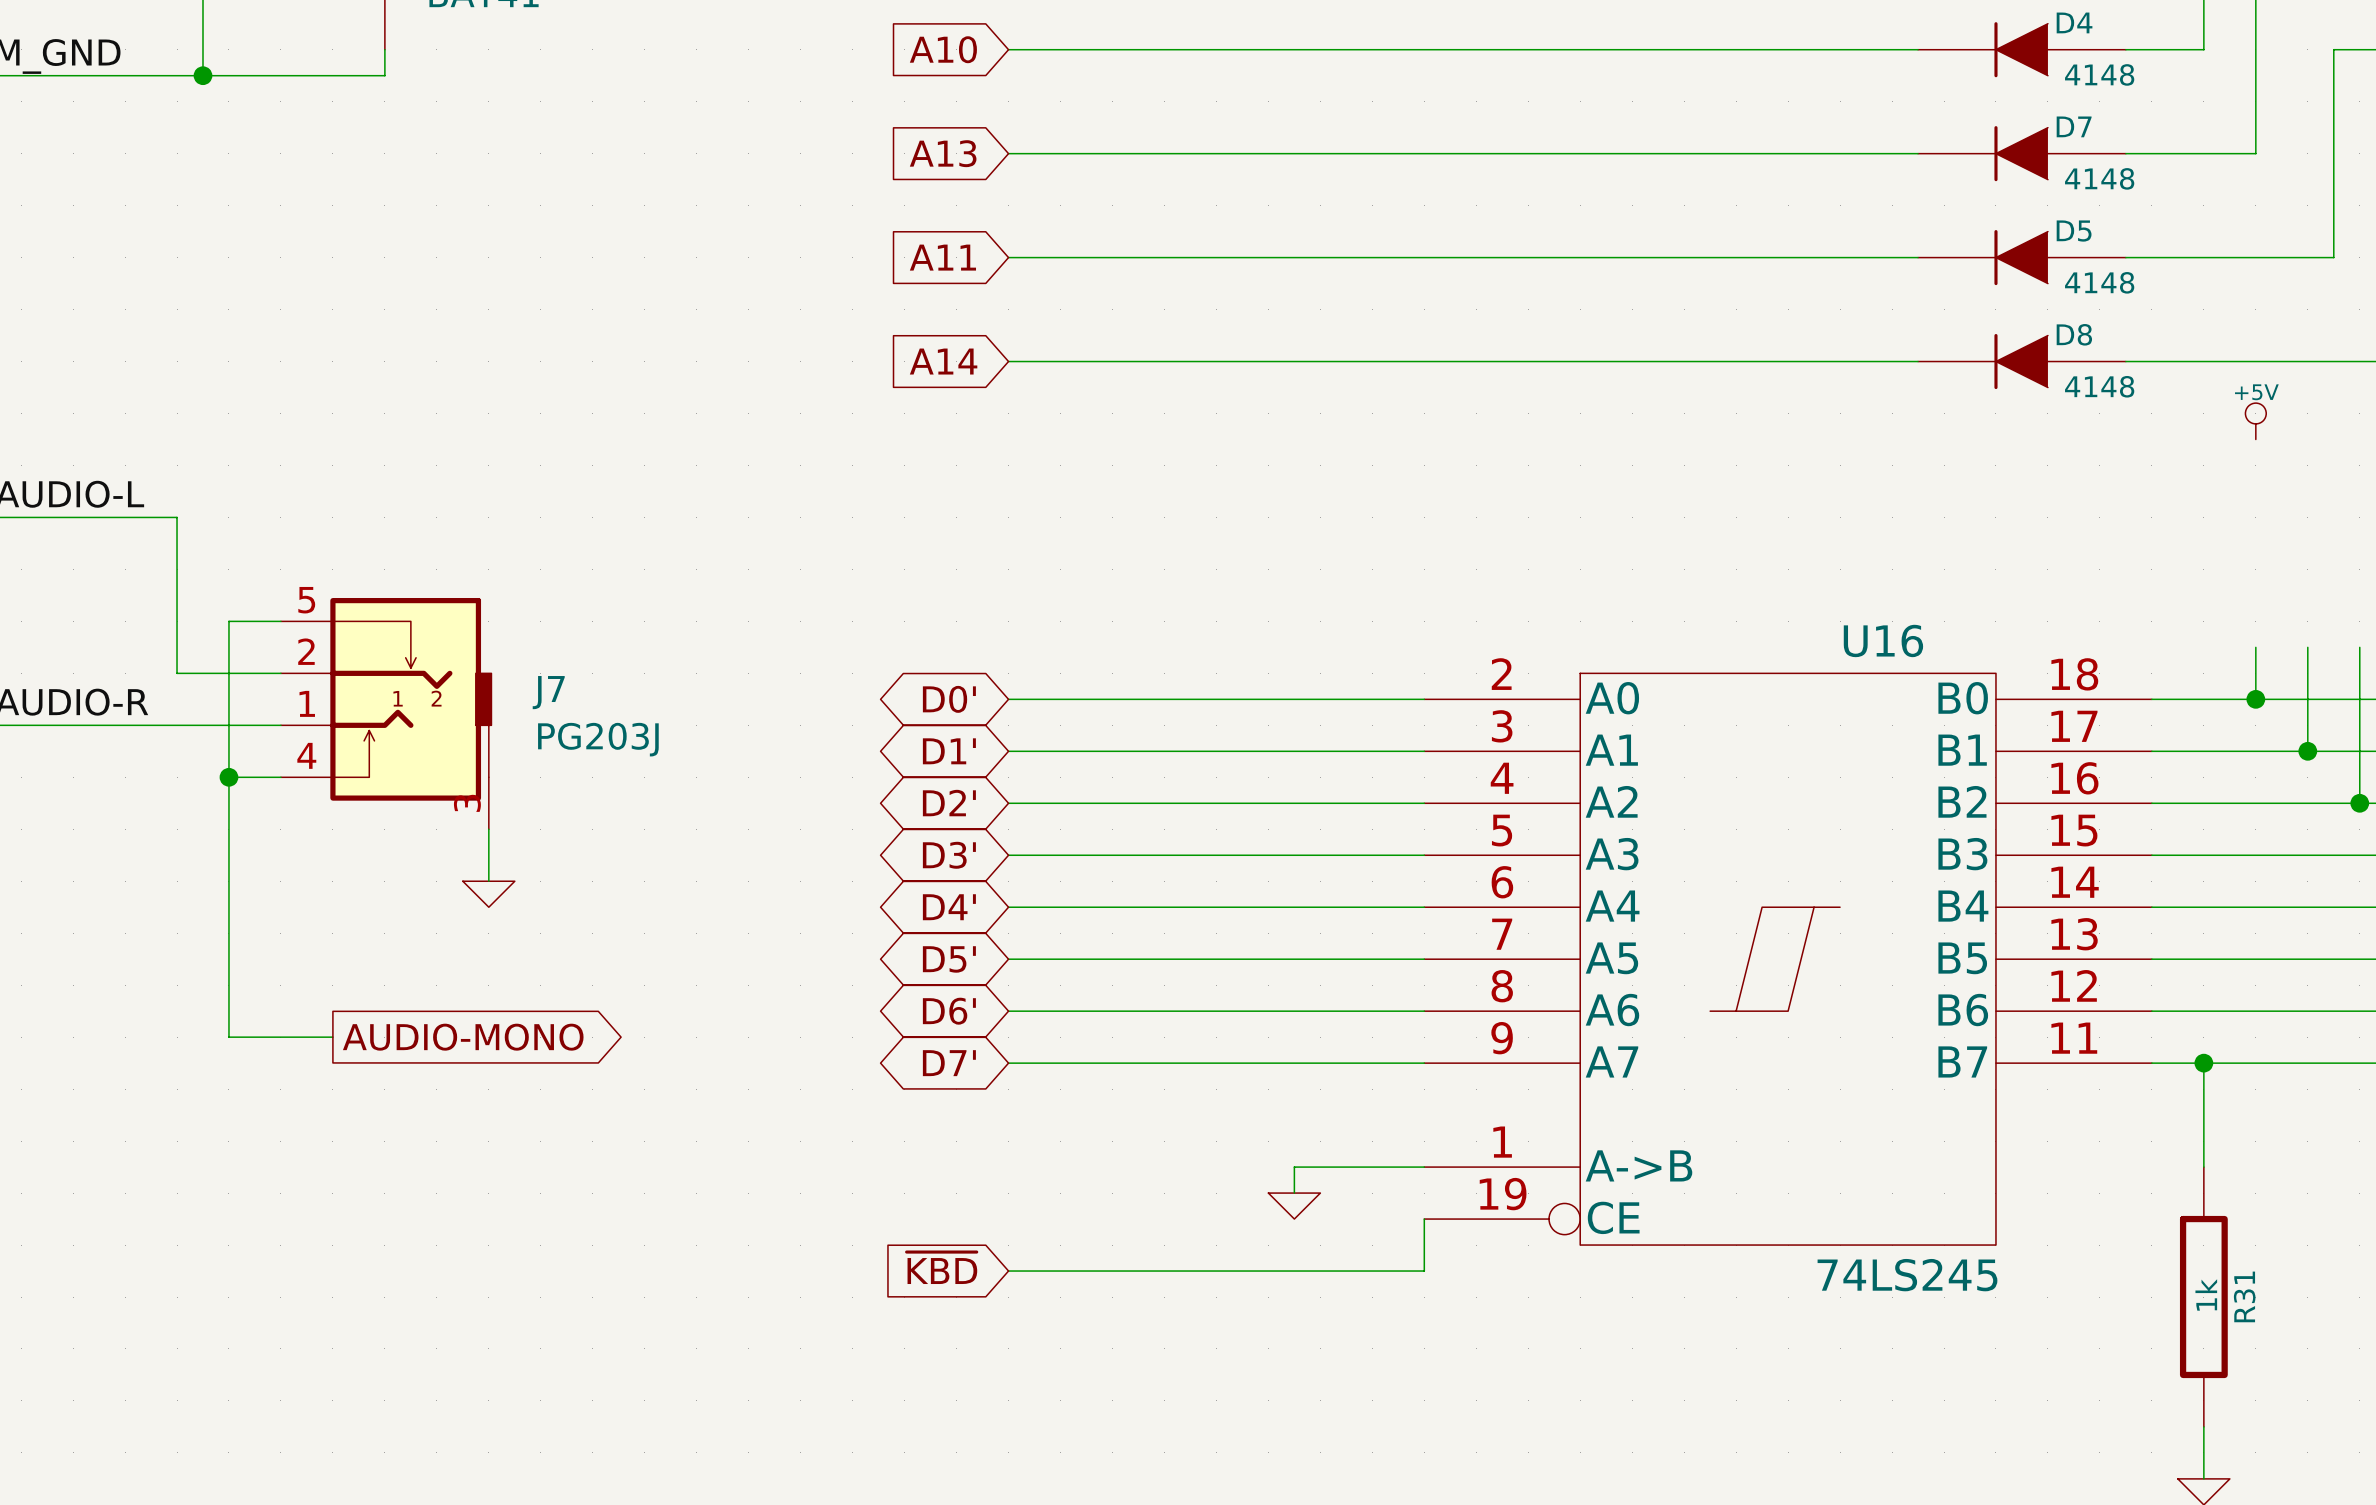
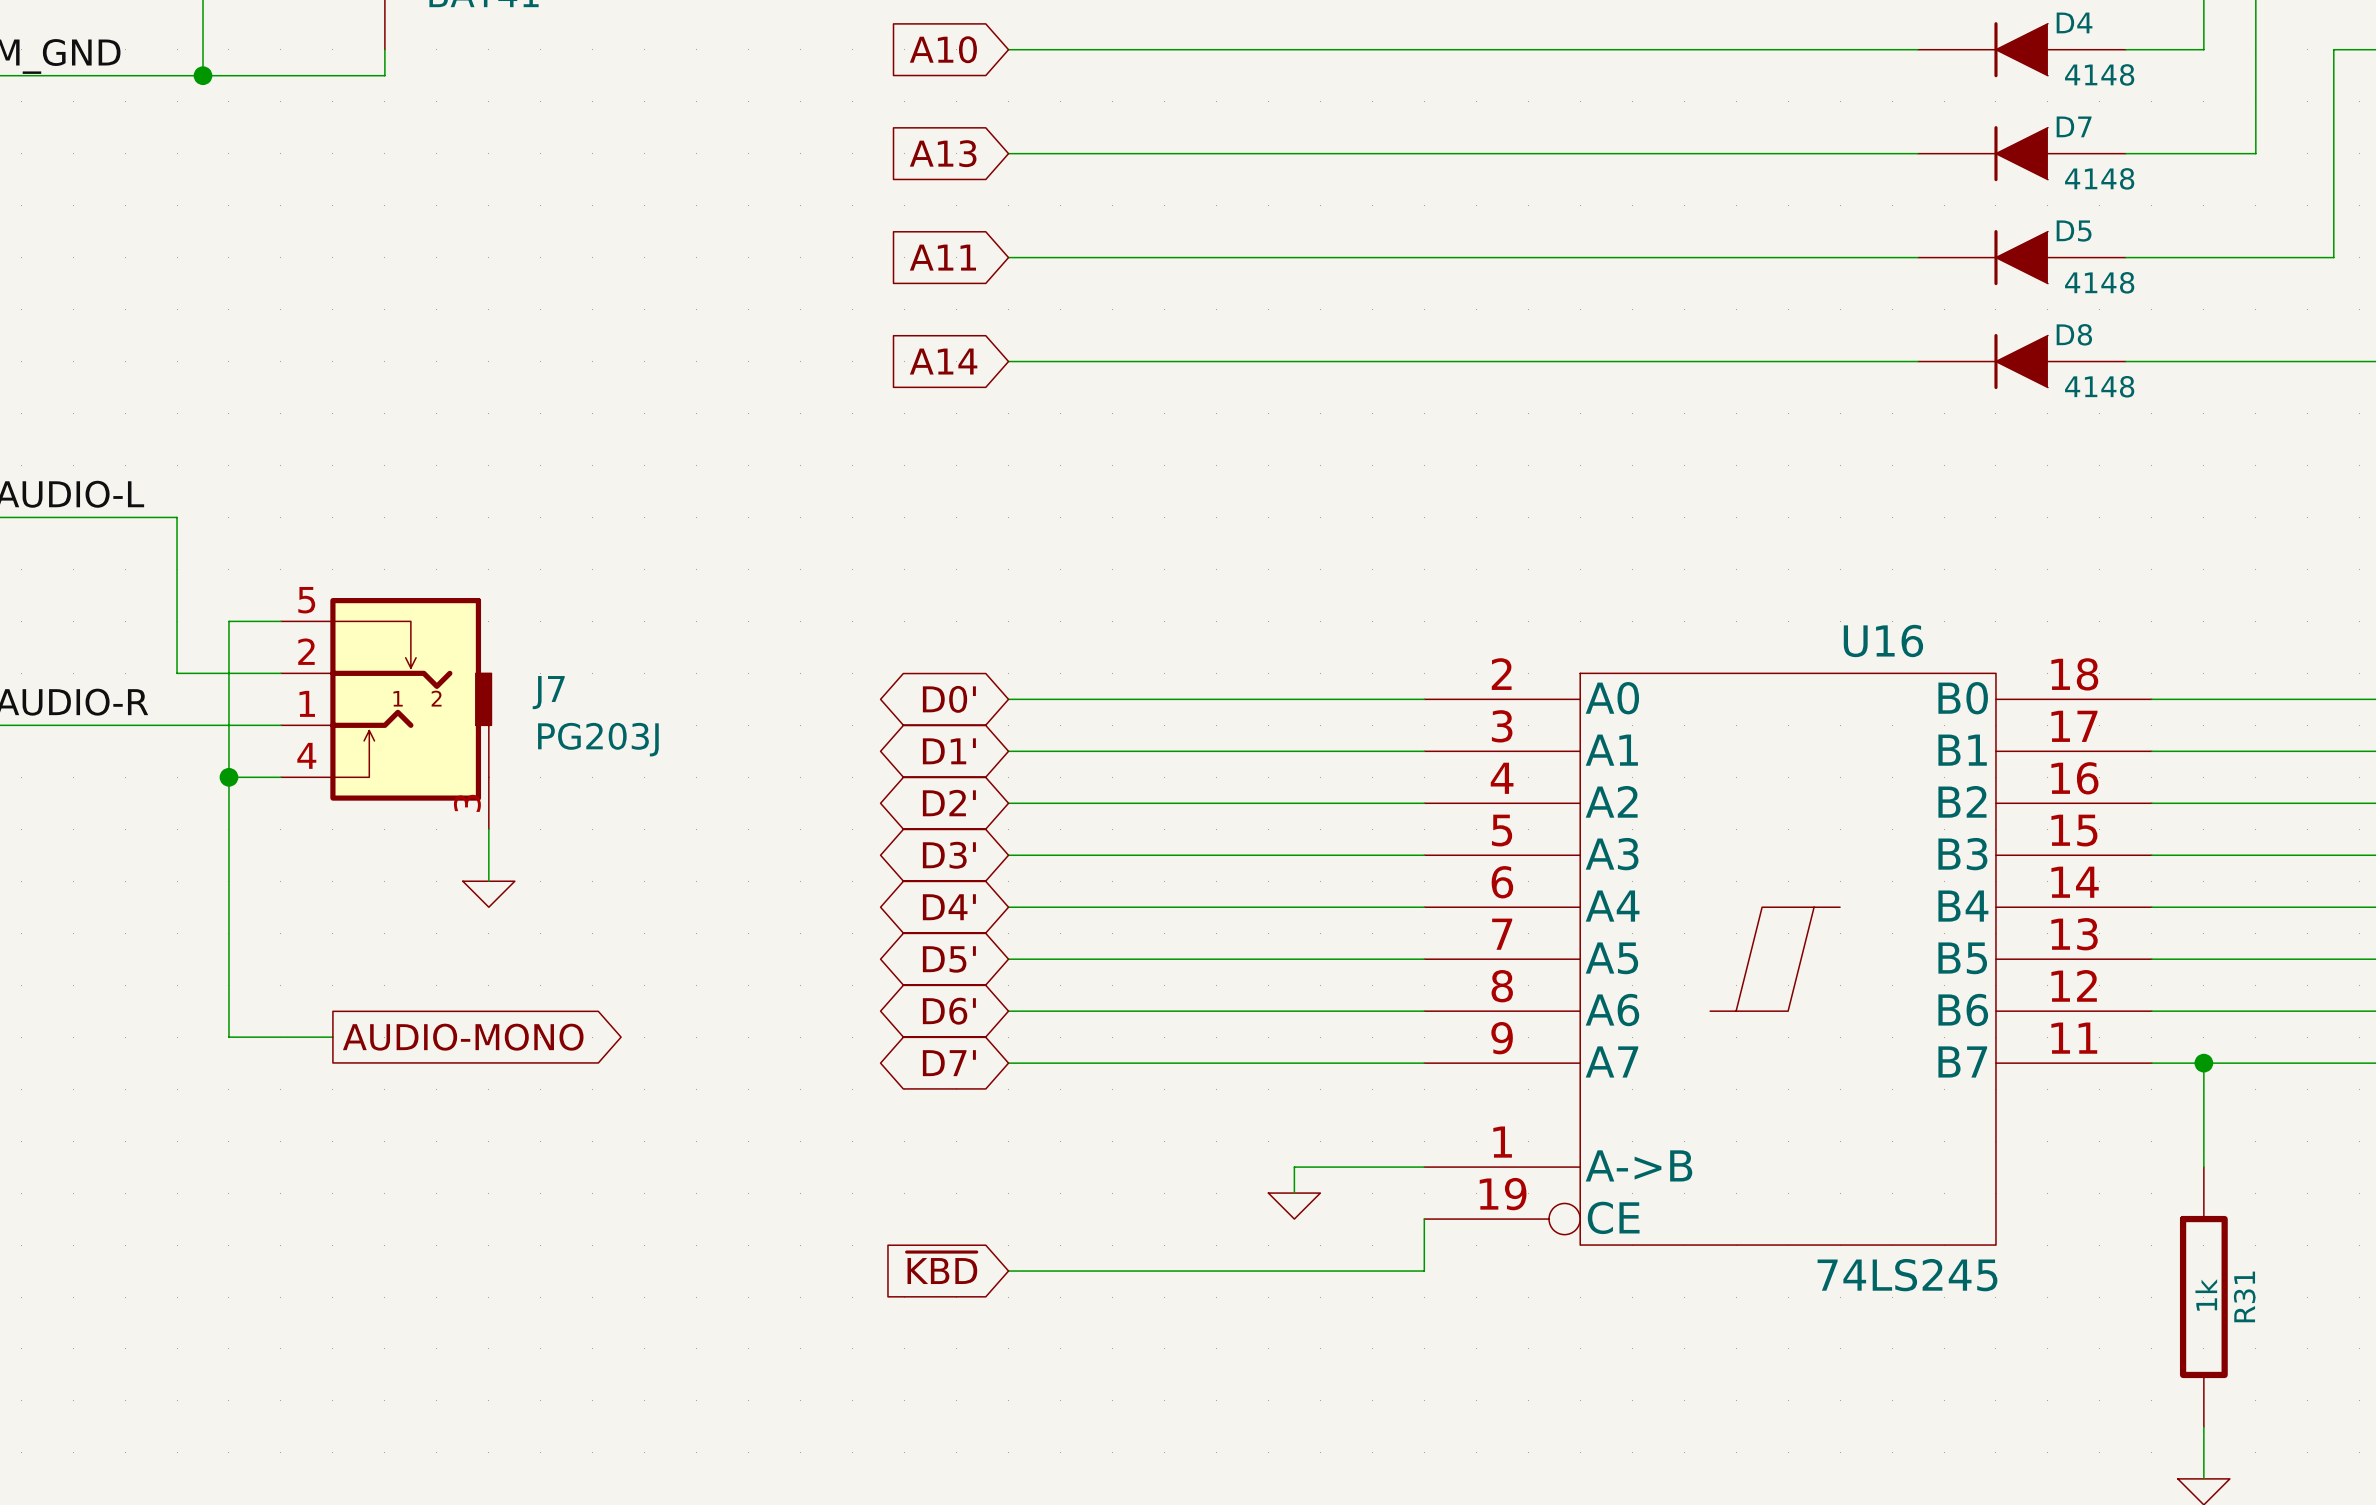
power symbol: +5V (2255, 421) -> none
wire: (2255, 647) (2255, 699) -> none
wire: (2307, 647) (2307, 751) -> none
wire: (2359, 647) (2359, 803) -> none
junction: (2255, 699) -> none
junction: (2307, 751) -> none
junction: (2359, 803) -> none

